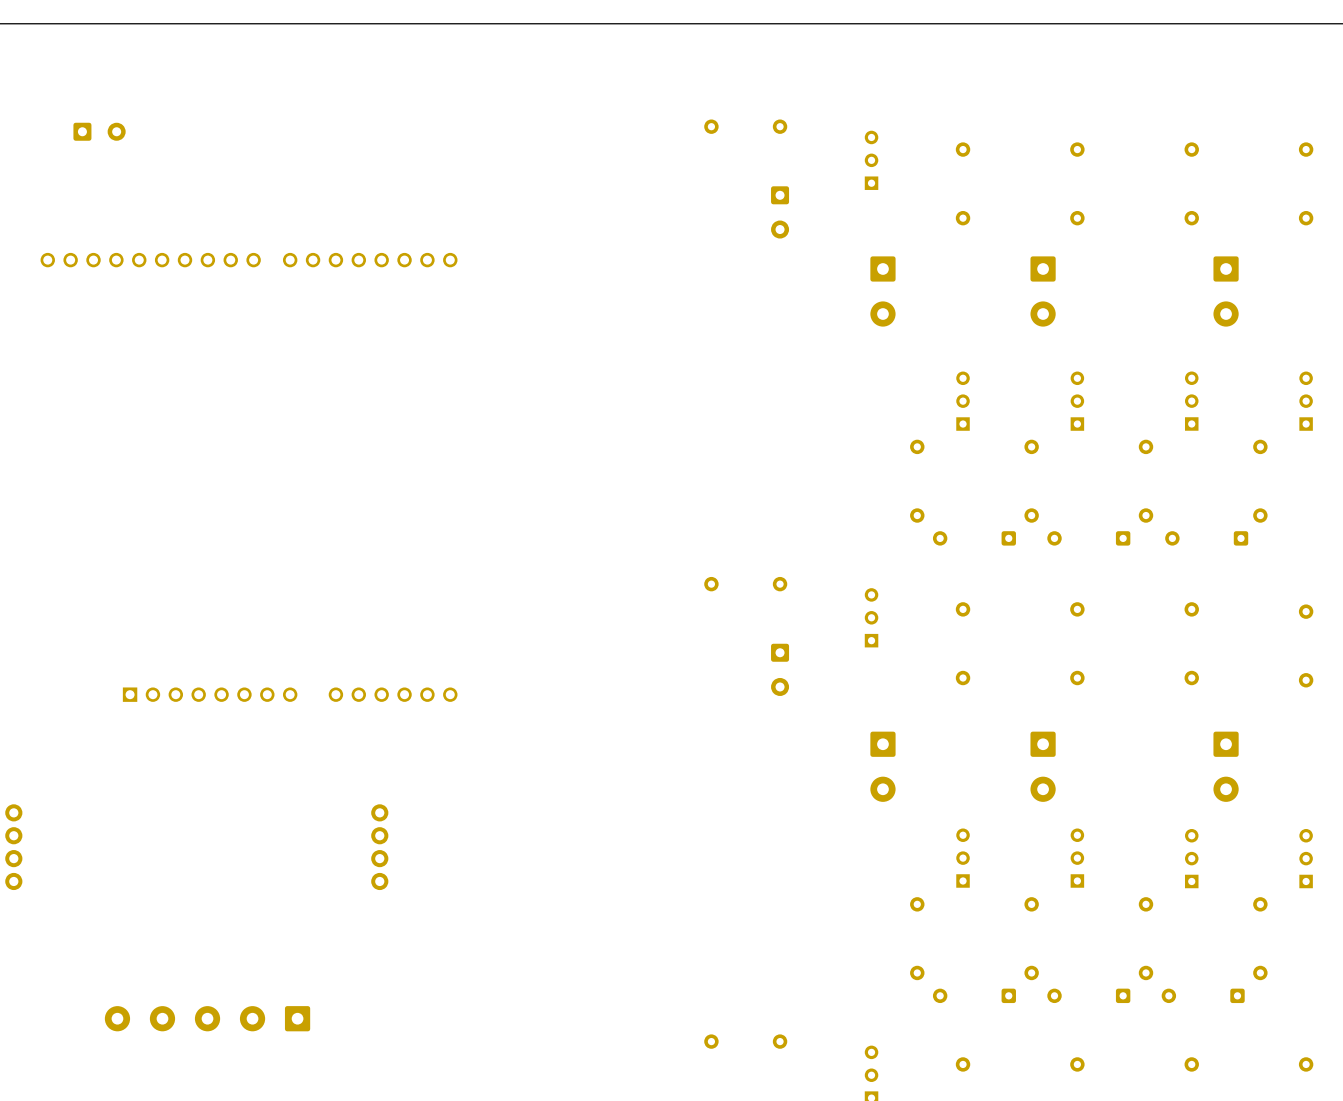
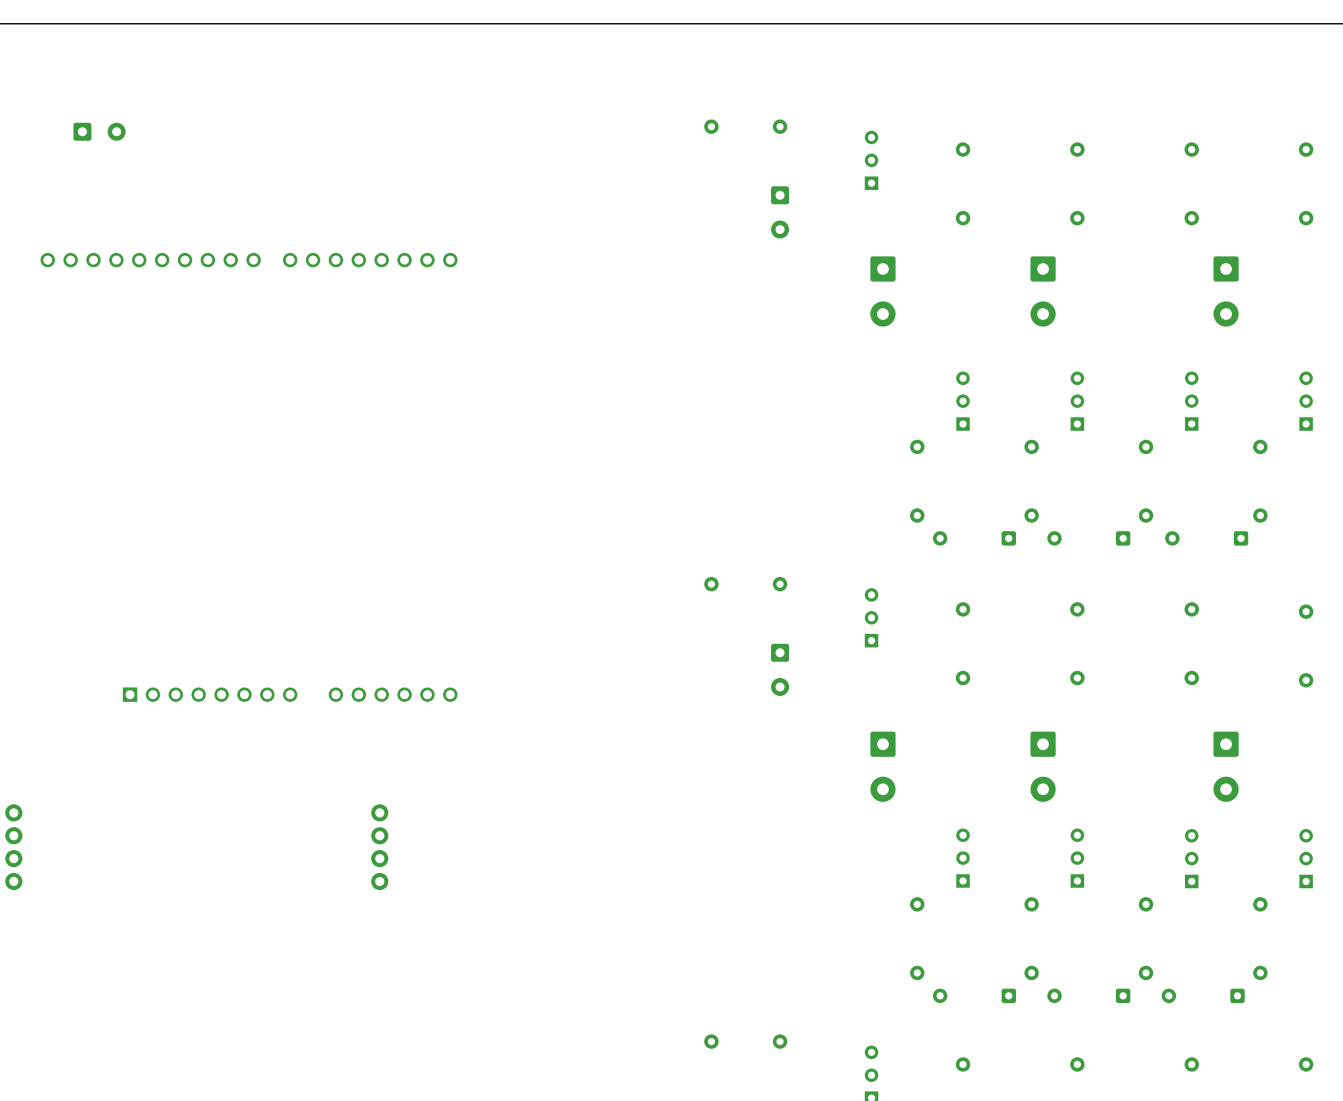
part: (207, 1018) -> none

